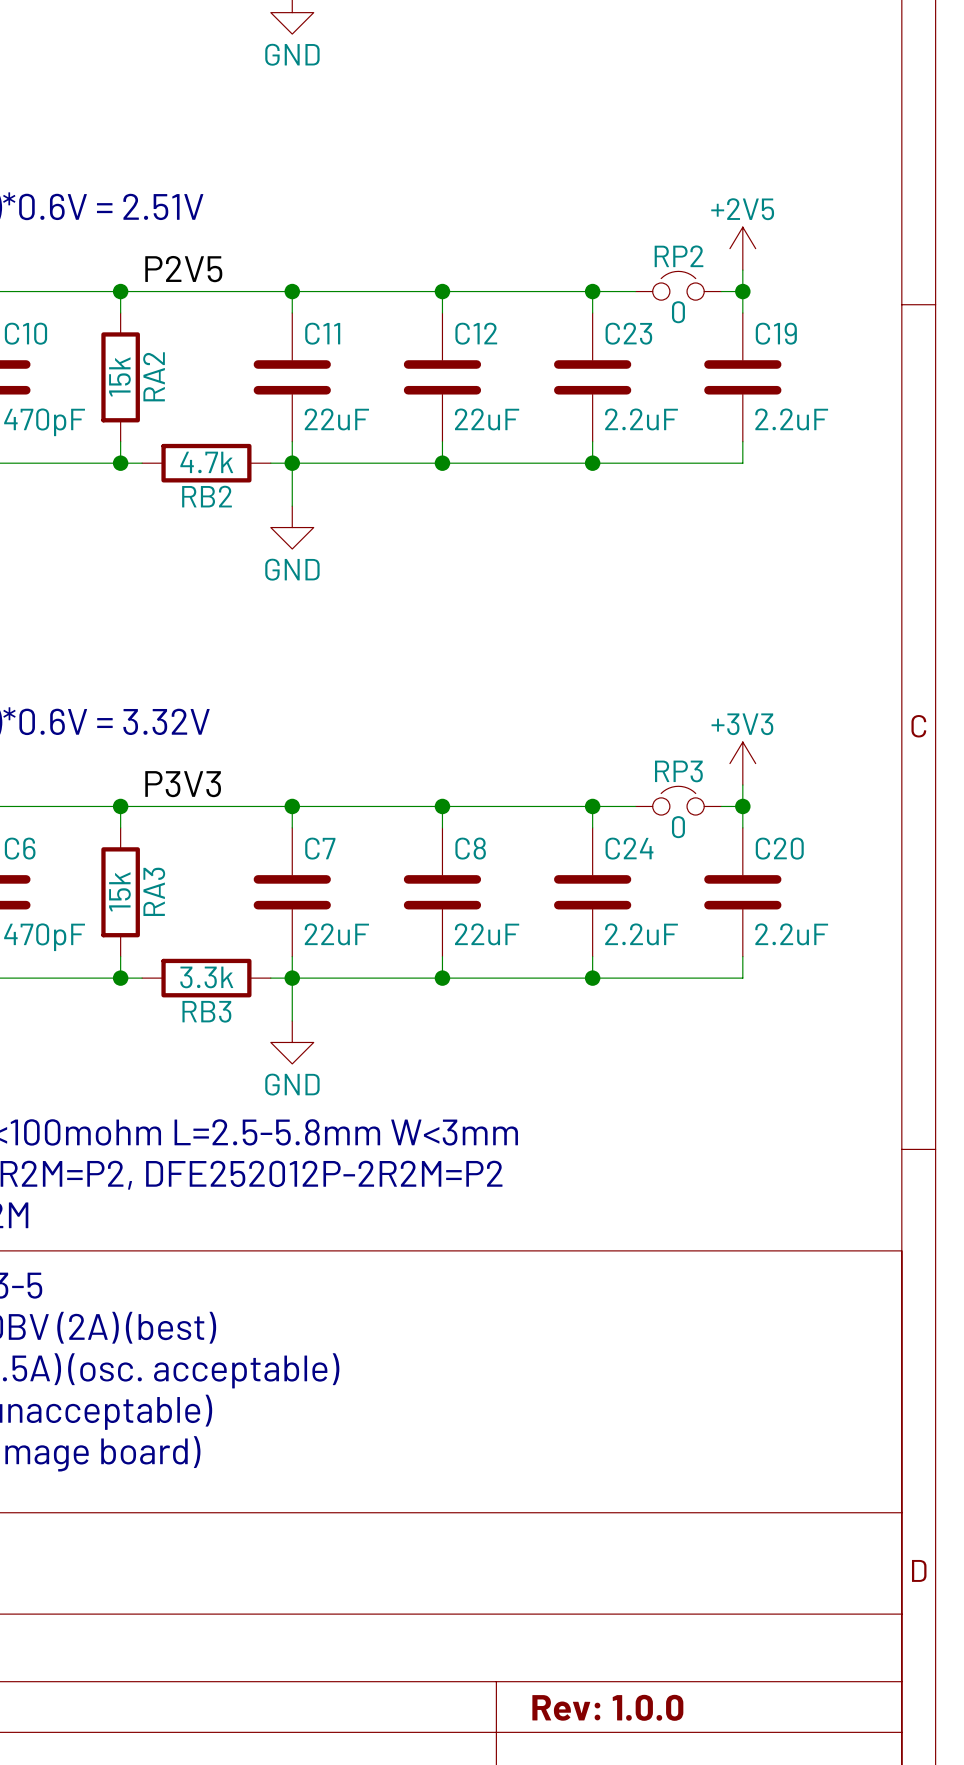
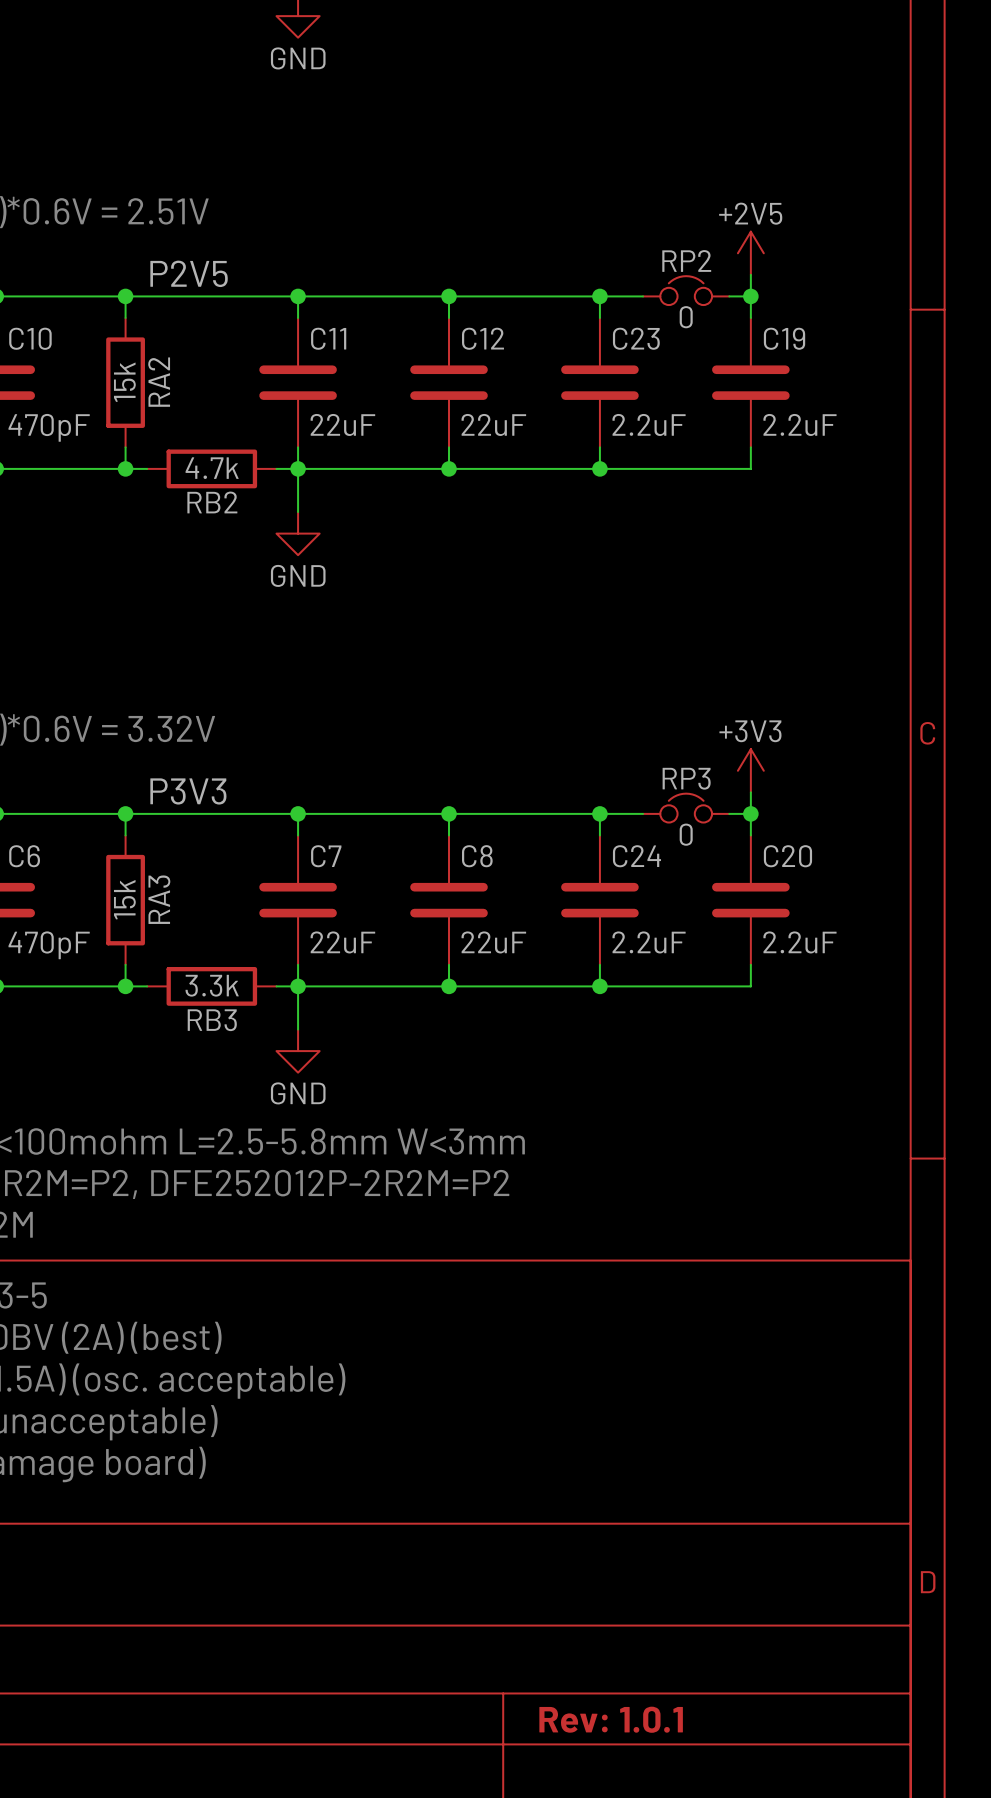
title block: Rev: 1.0.0 (607, 1707) -> Rev: 1.0.1 (611, 1719)

